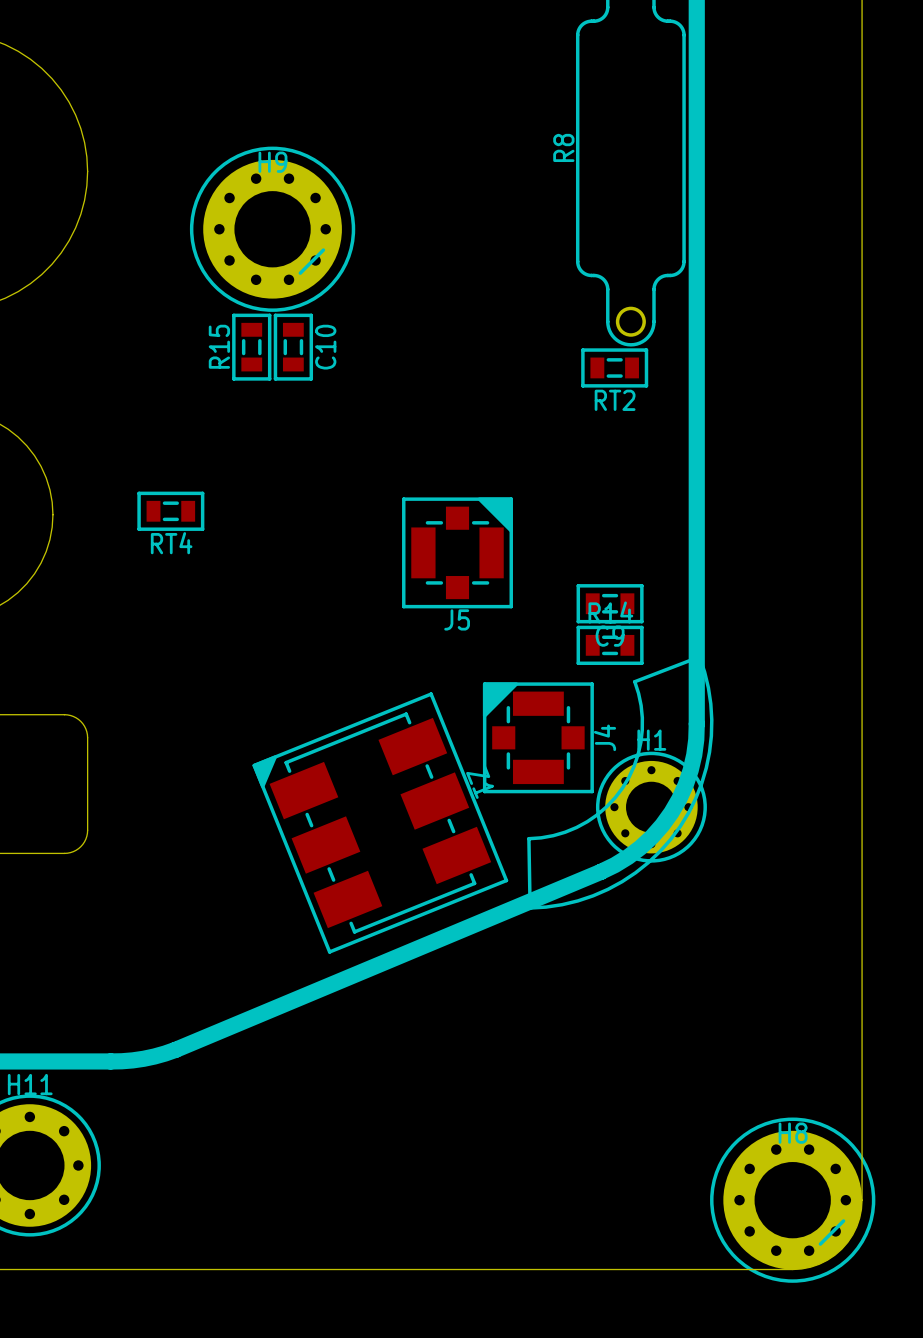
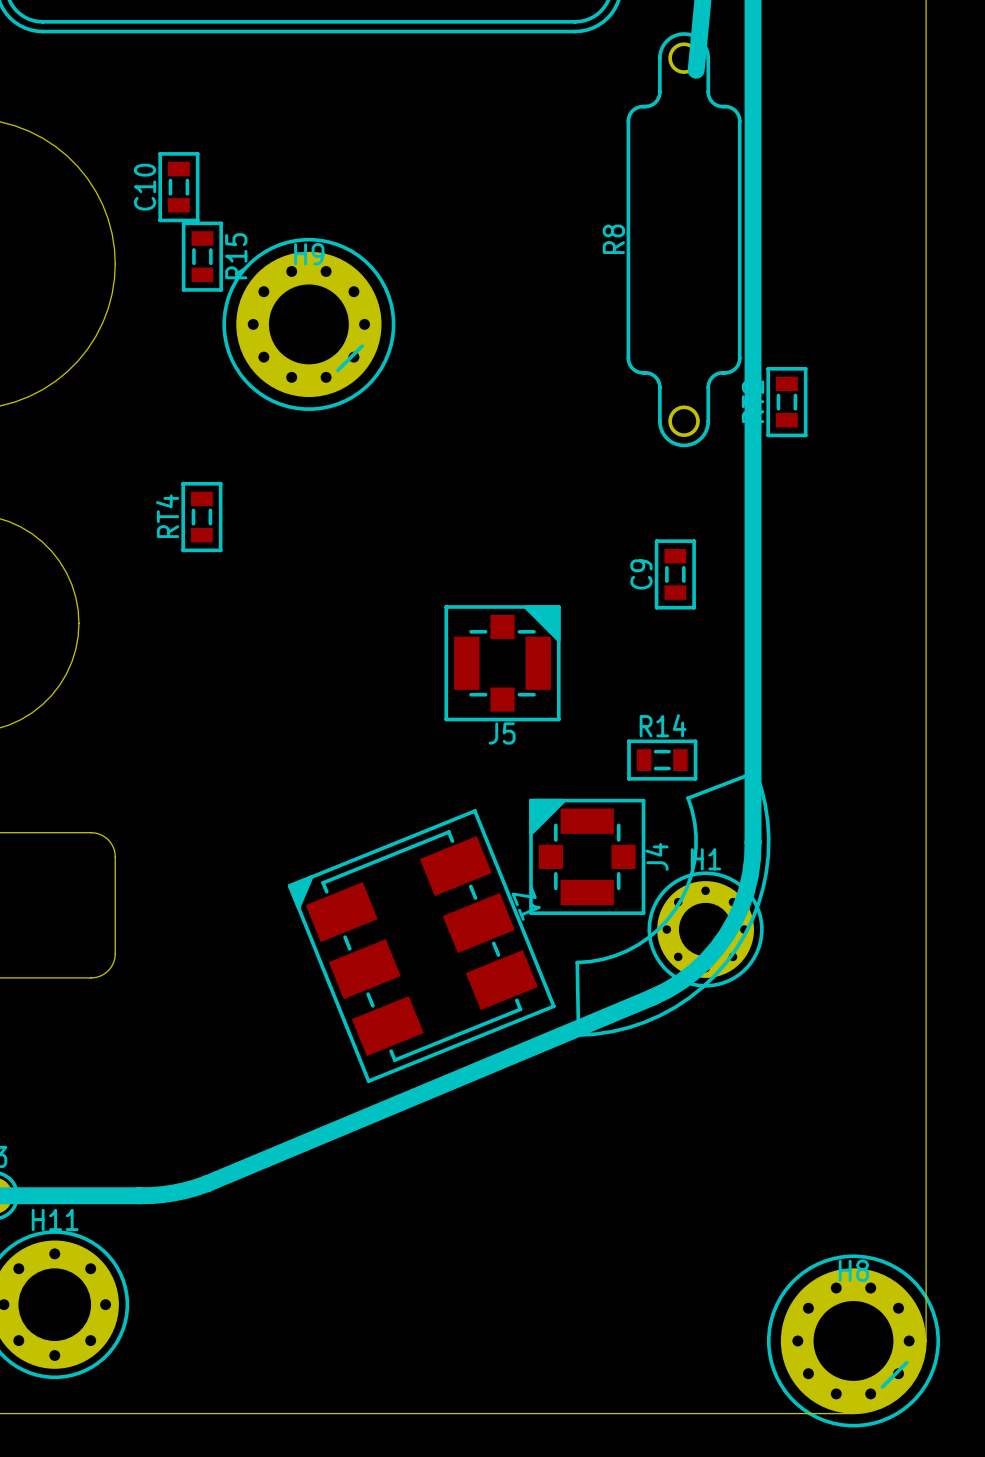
R15 name position: R15 (219, 346) -> R15 (236, 256)
R15 position: (251, 347) -> (202, 256)
C10 position: (293, 347) -> (178, 187)
C10 name position: C10 (325, 347) -> C10 (145, 187)
RT2 rotation: 0° (614, 367) -> 90° clockwise (786, 402)
RT2 position: (614, 367) -> (786, 402)
RT4 rotation: 0° (170, 511) -> 90° clockwise (201, 517)
RT4 position: (170, 511) -> (201, 517)
C9 rotation: 0° (610, 603) -> 90° clockwise (675, 574)
C9 position: (610, 603) -> (675, 574)

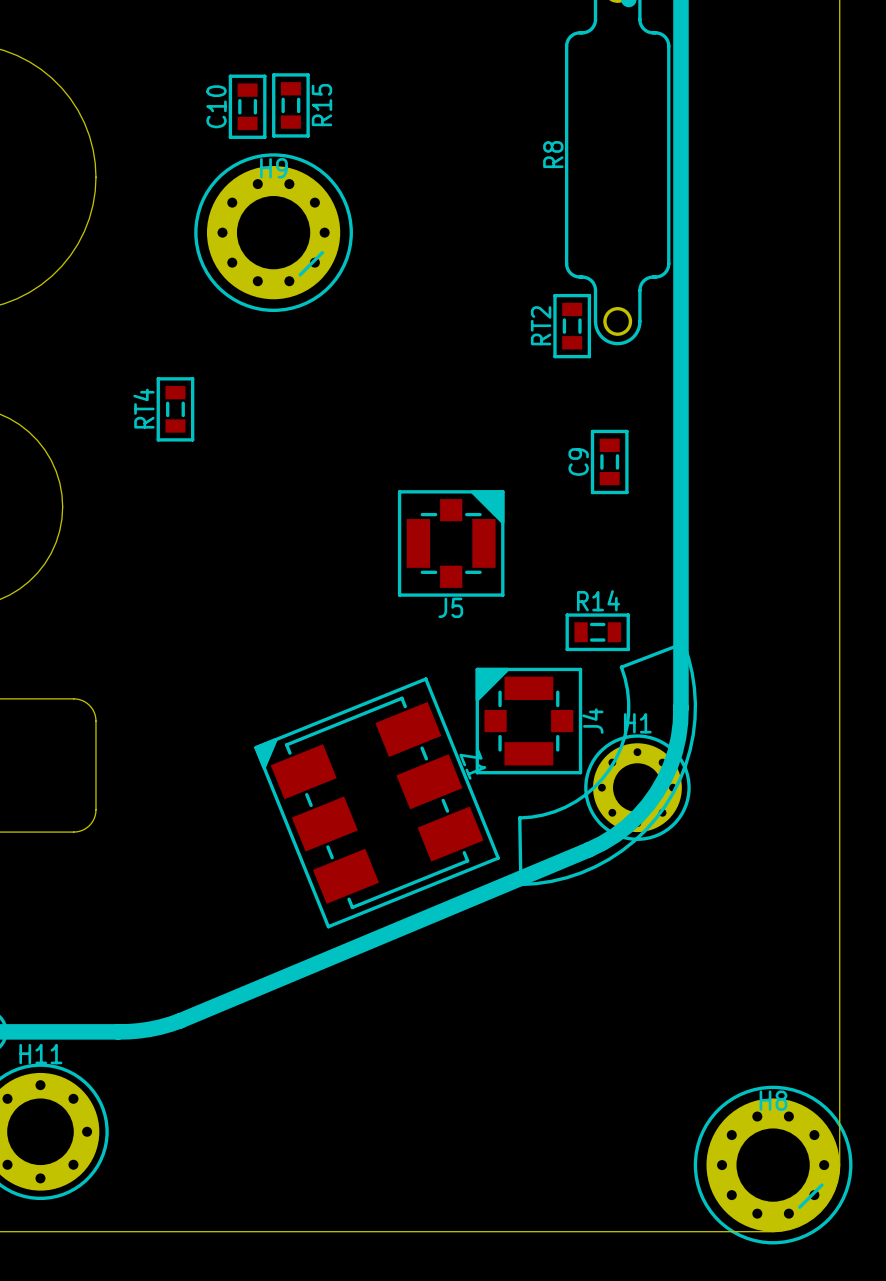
C10 position: (178, 187) -> (247, 106)
R15 position: (202, 256) -> (290, 105)
RT2 position: (786, 402) -> (572, 326)

